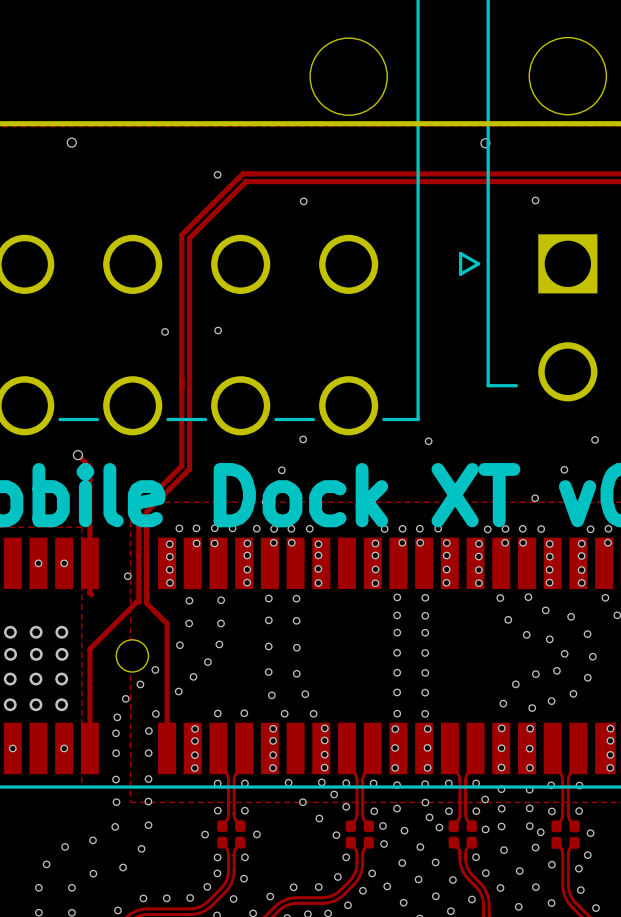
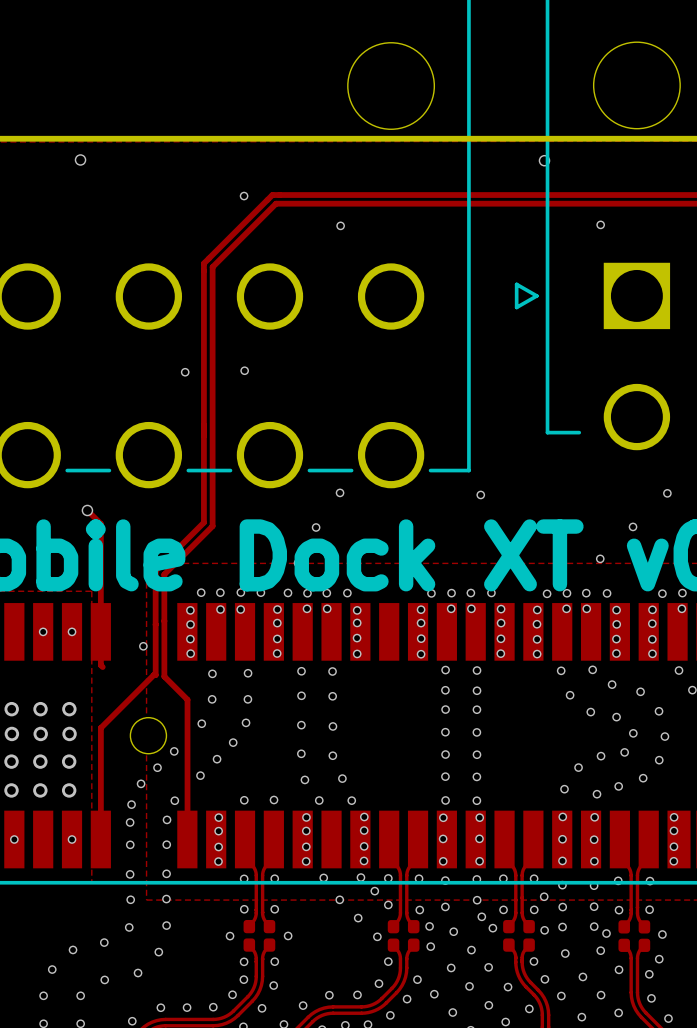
via: none -> (674, 817)
via: (610, 728) -> none
via: none -> (673, 830)
via: (610, 740) -> none
via: none -> (673, 846)
via: (610, 754) -> none
via: none -> (673, 861)
via: (610, 767) -> none

